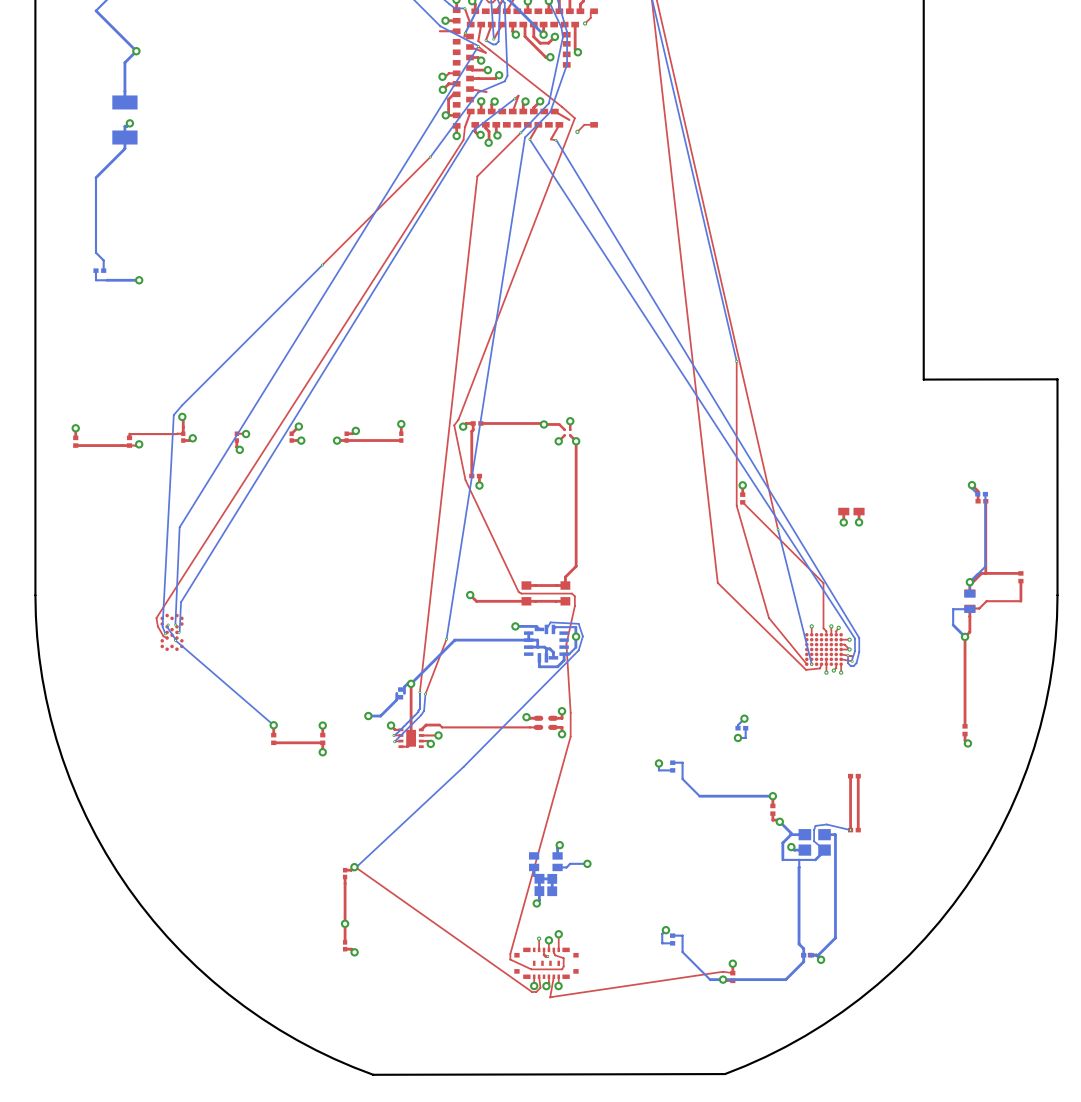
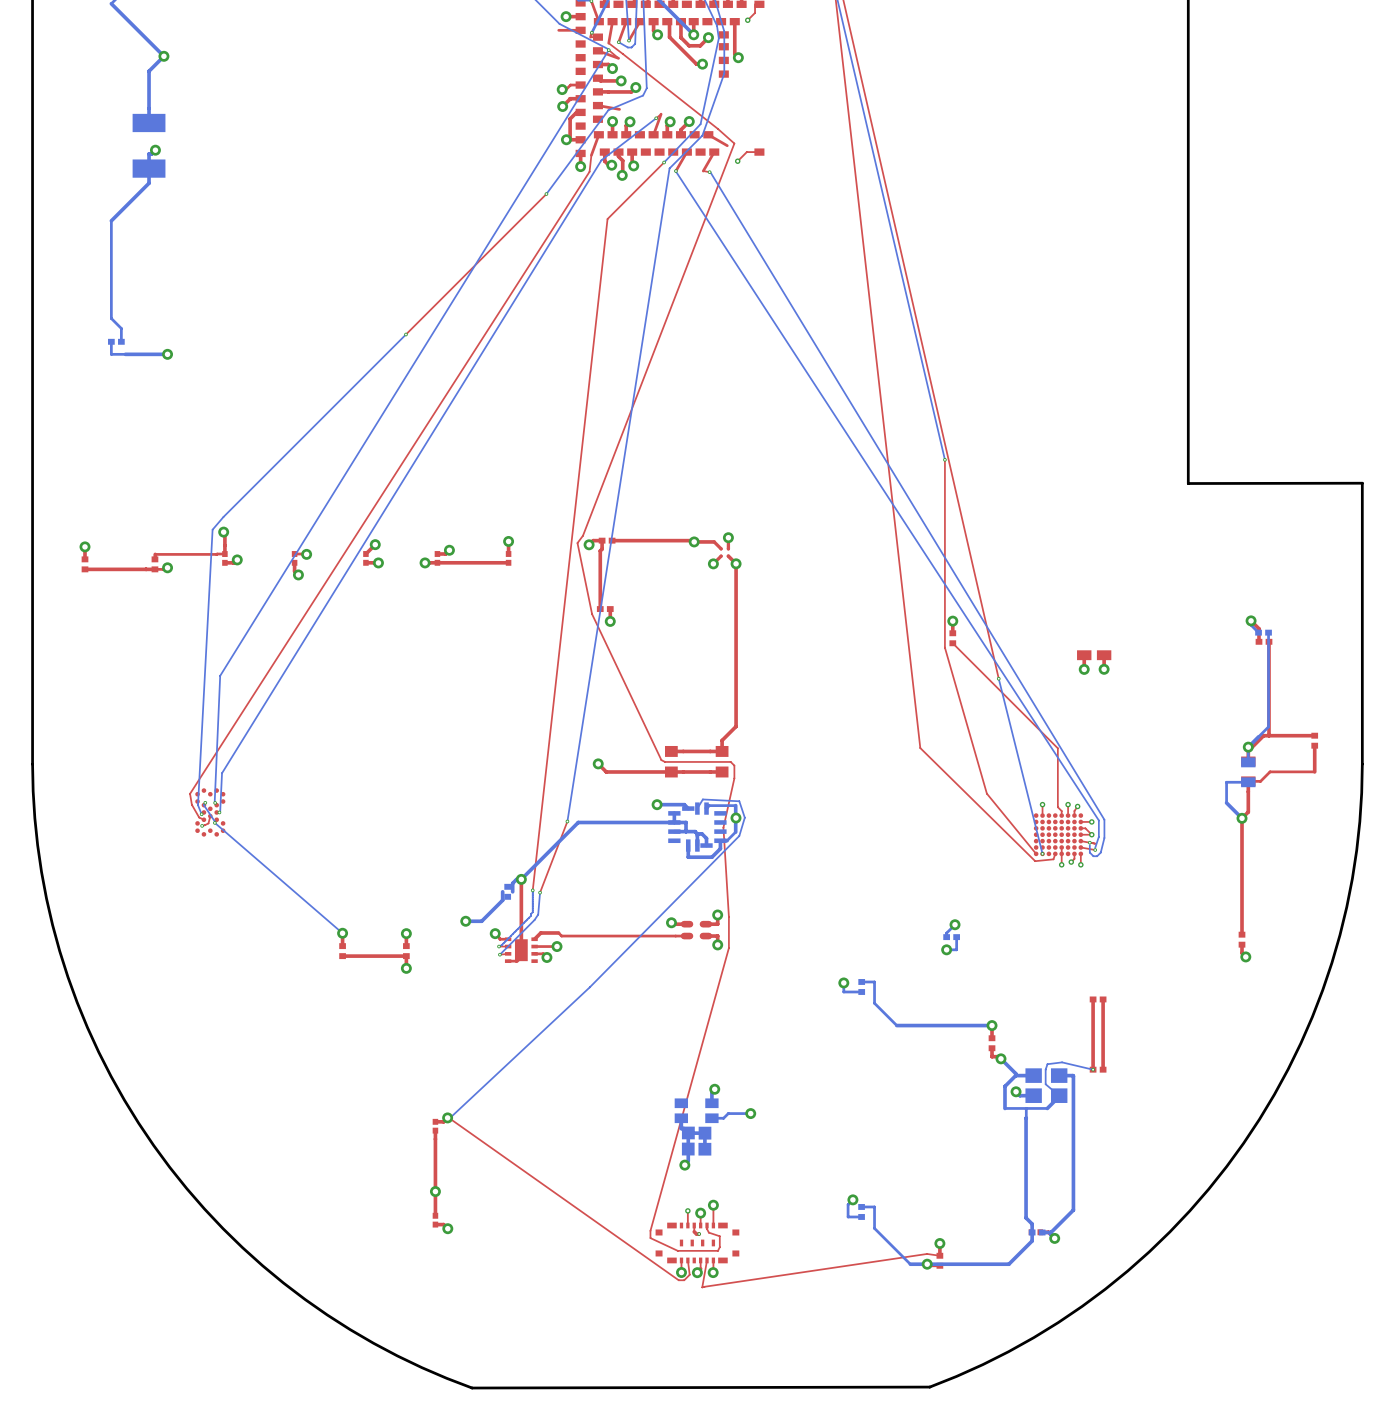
top track: none -> (210, 816) (208, 823) (202, 825)
via: none -> (202, 825)

